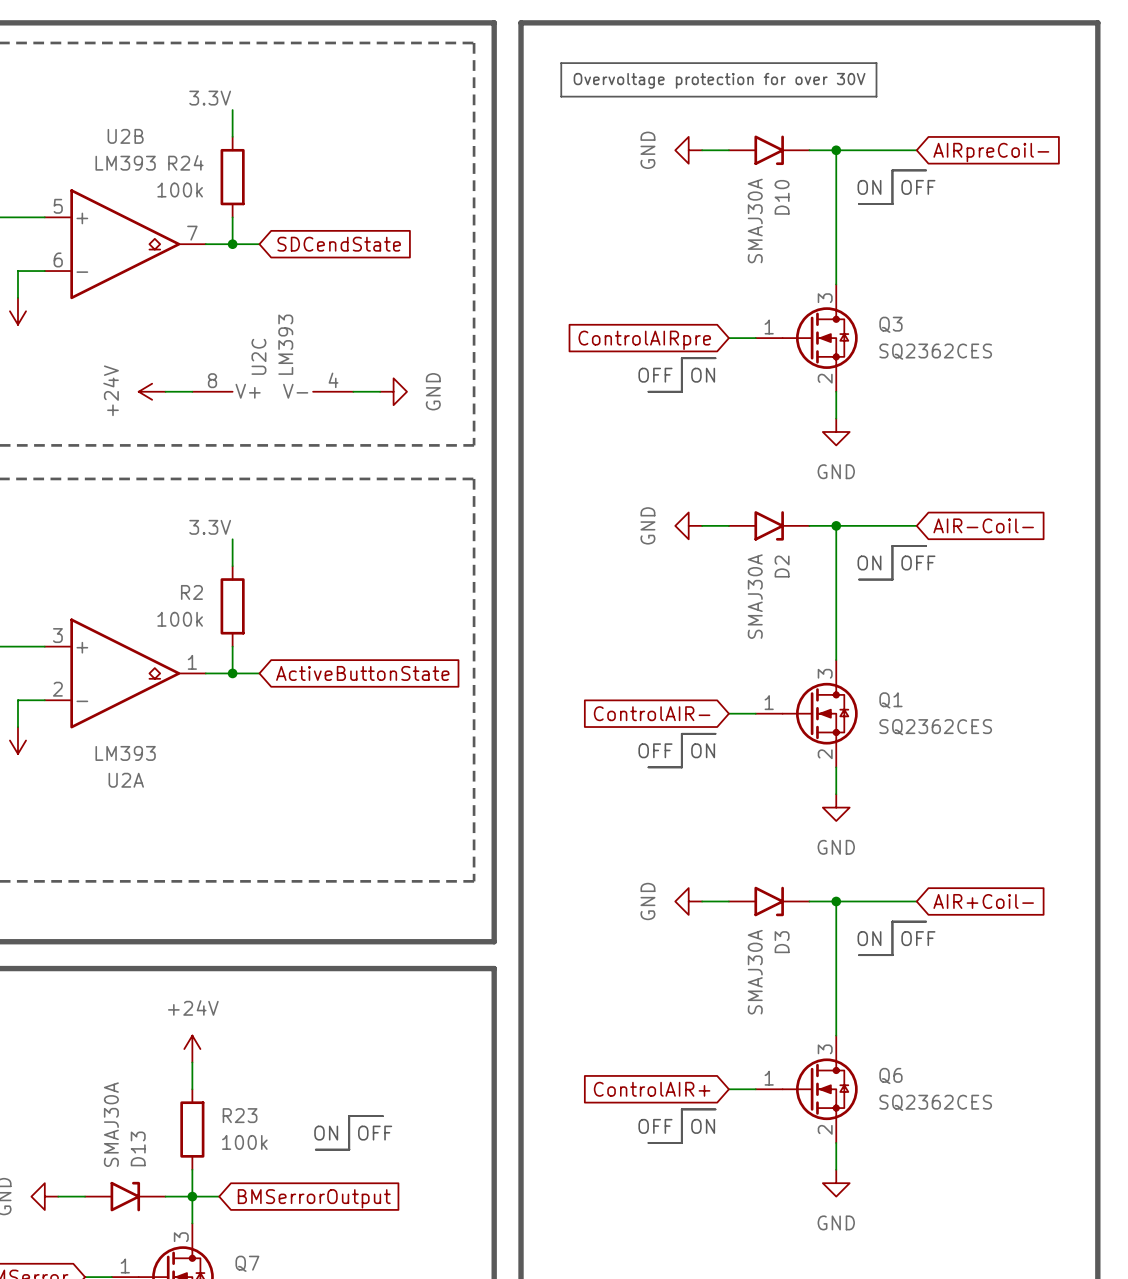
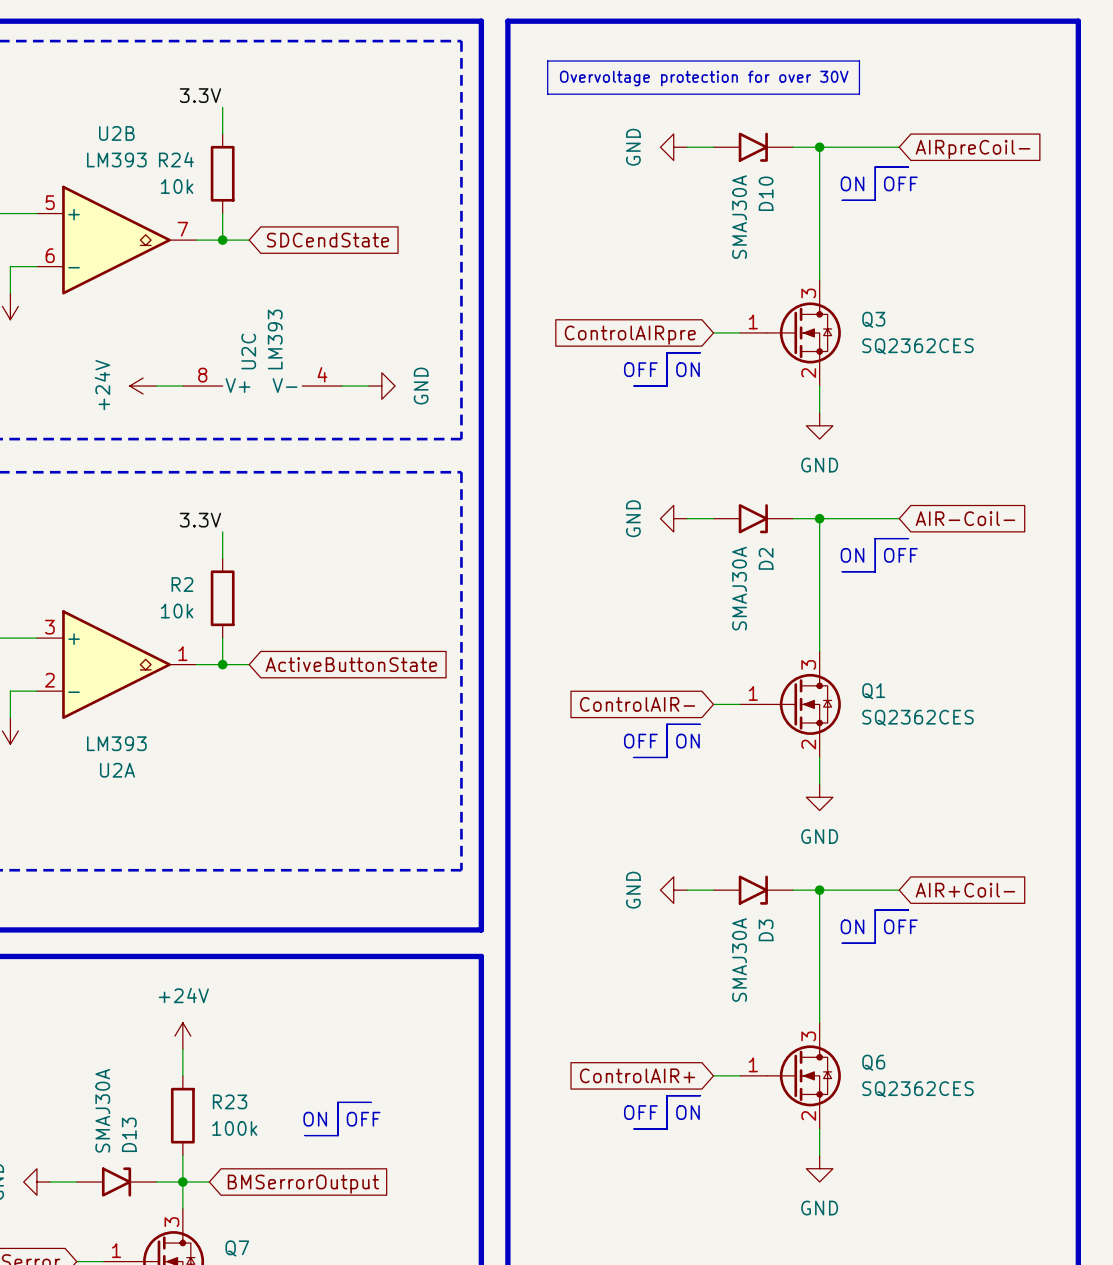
R24 value: 100k (180, 190) -> 10k (177, 186)
R2 value: 100k (180, 619) -> 10k (177, 611)

